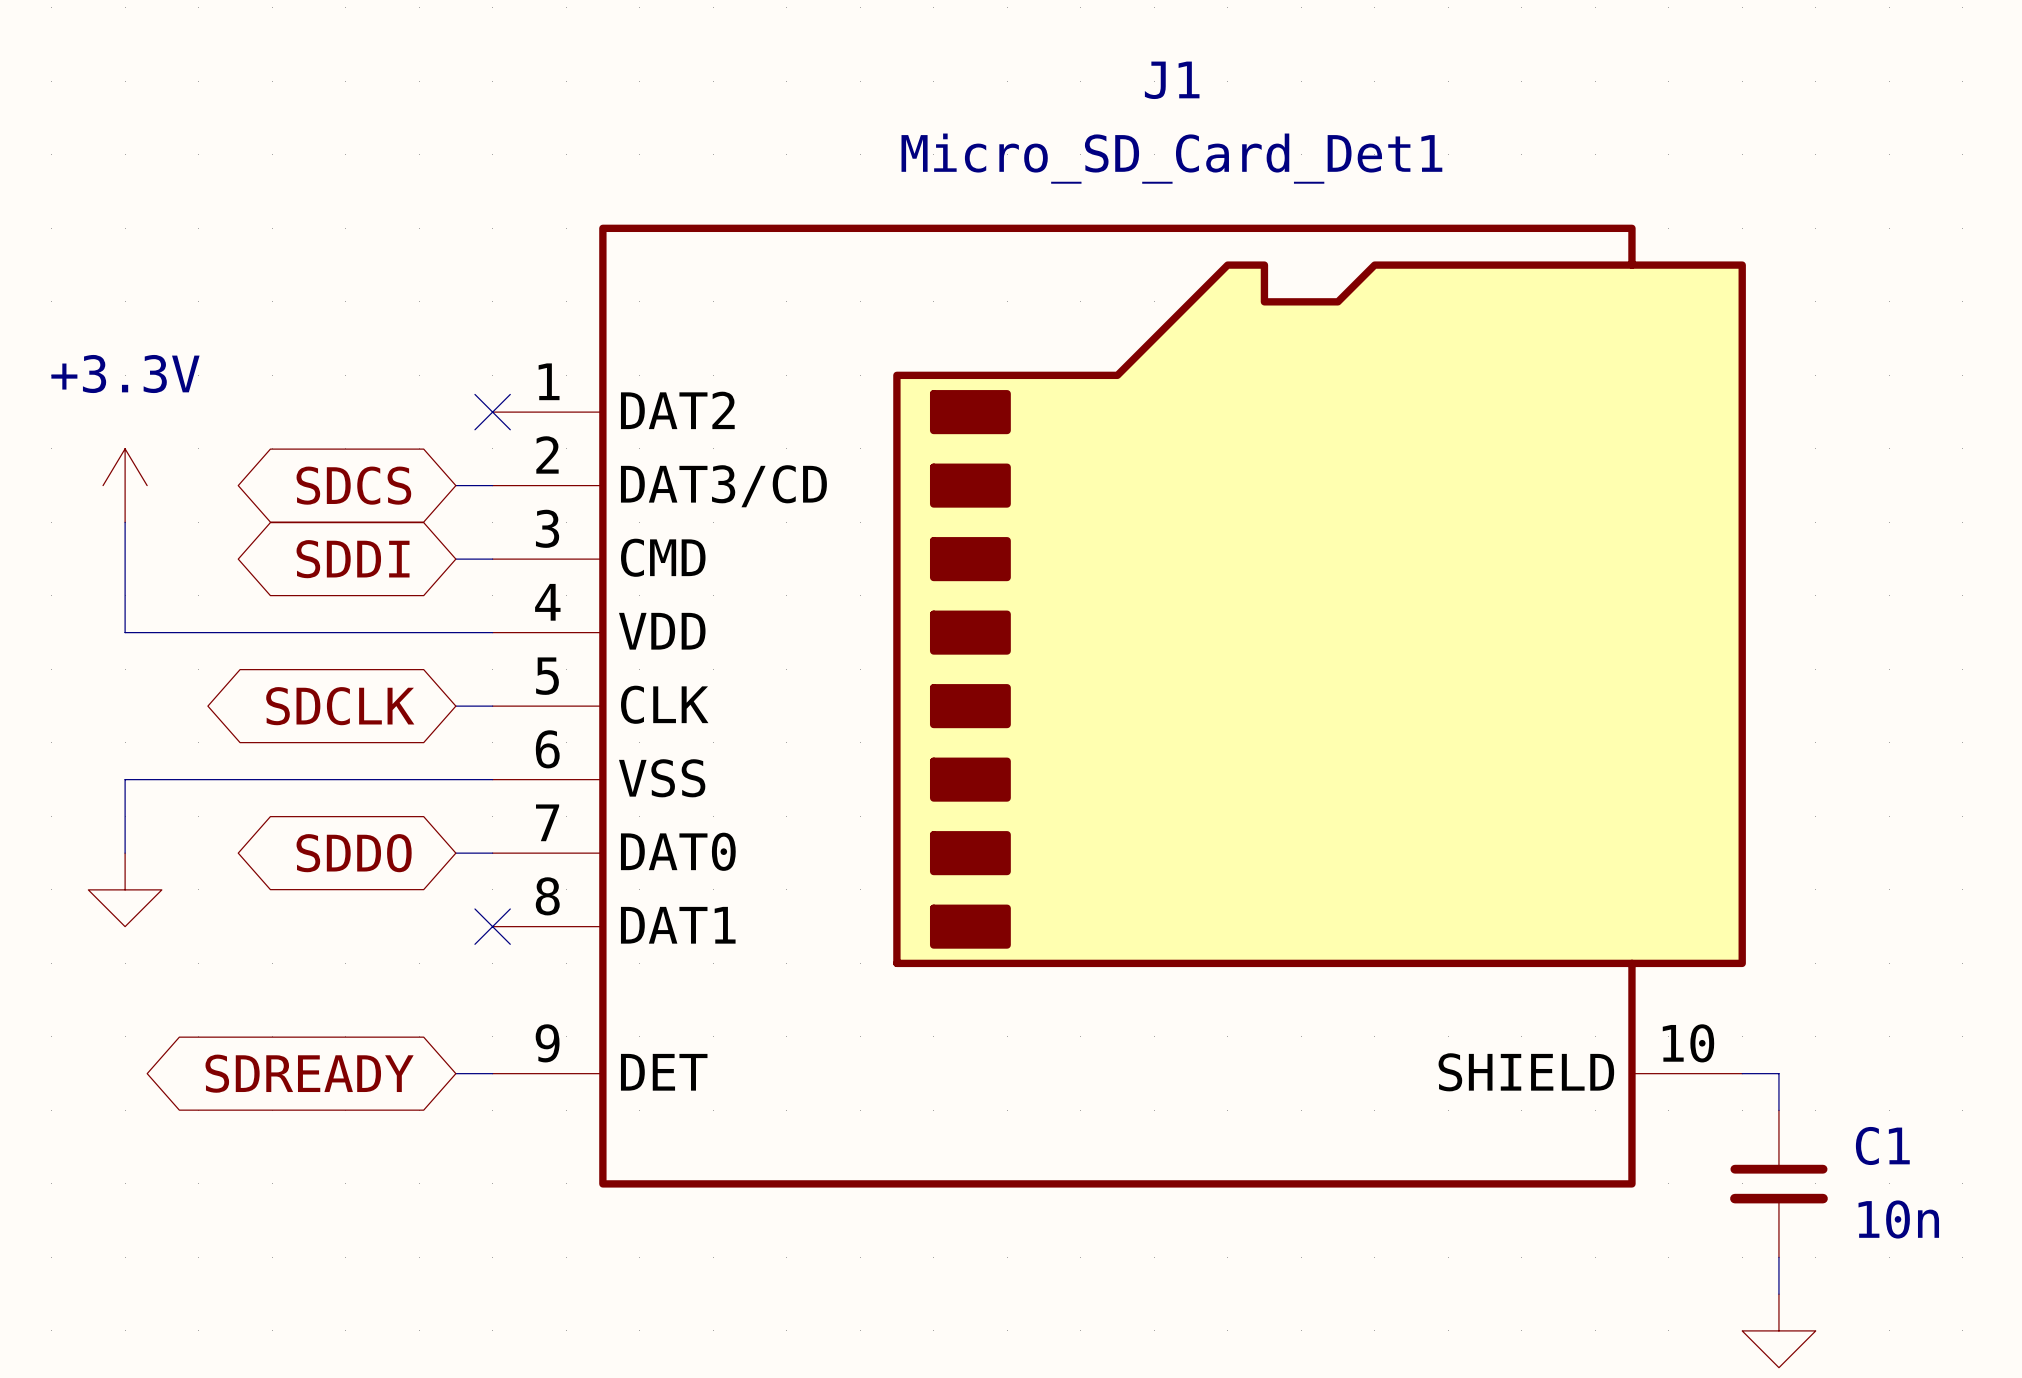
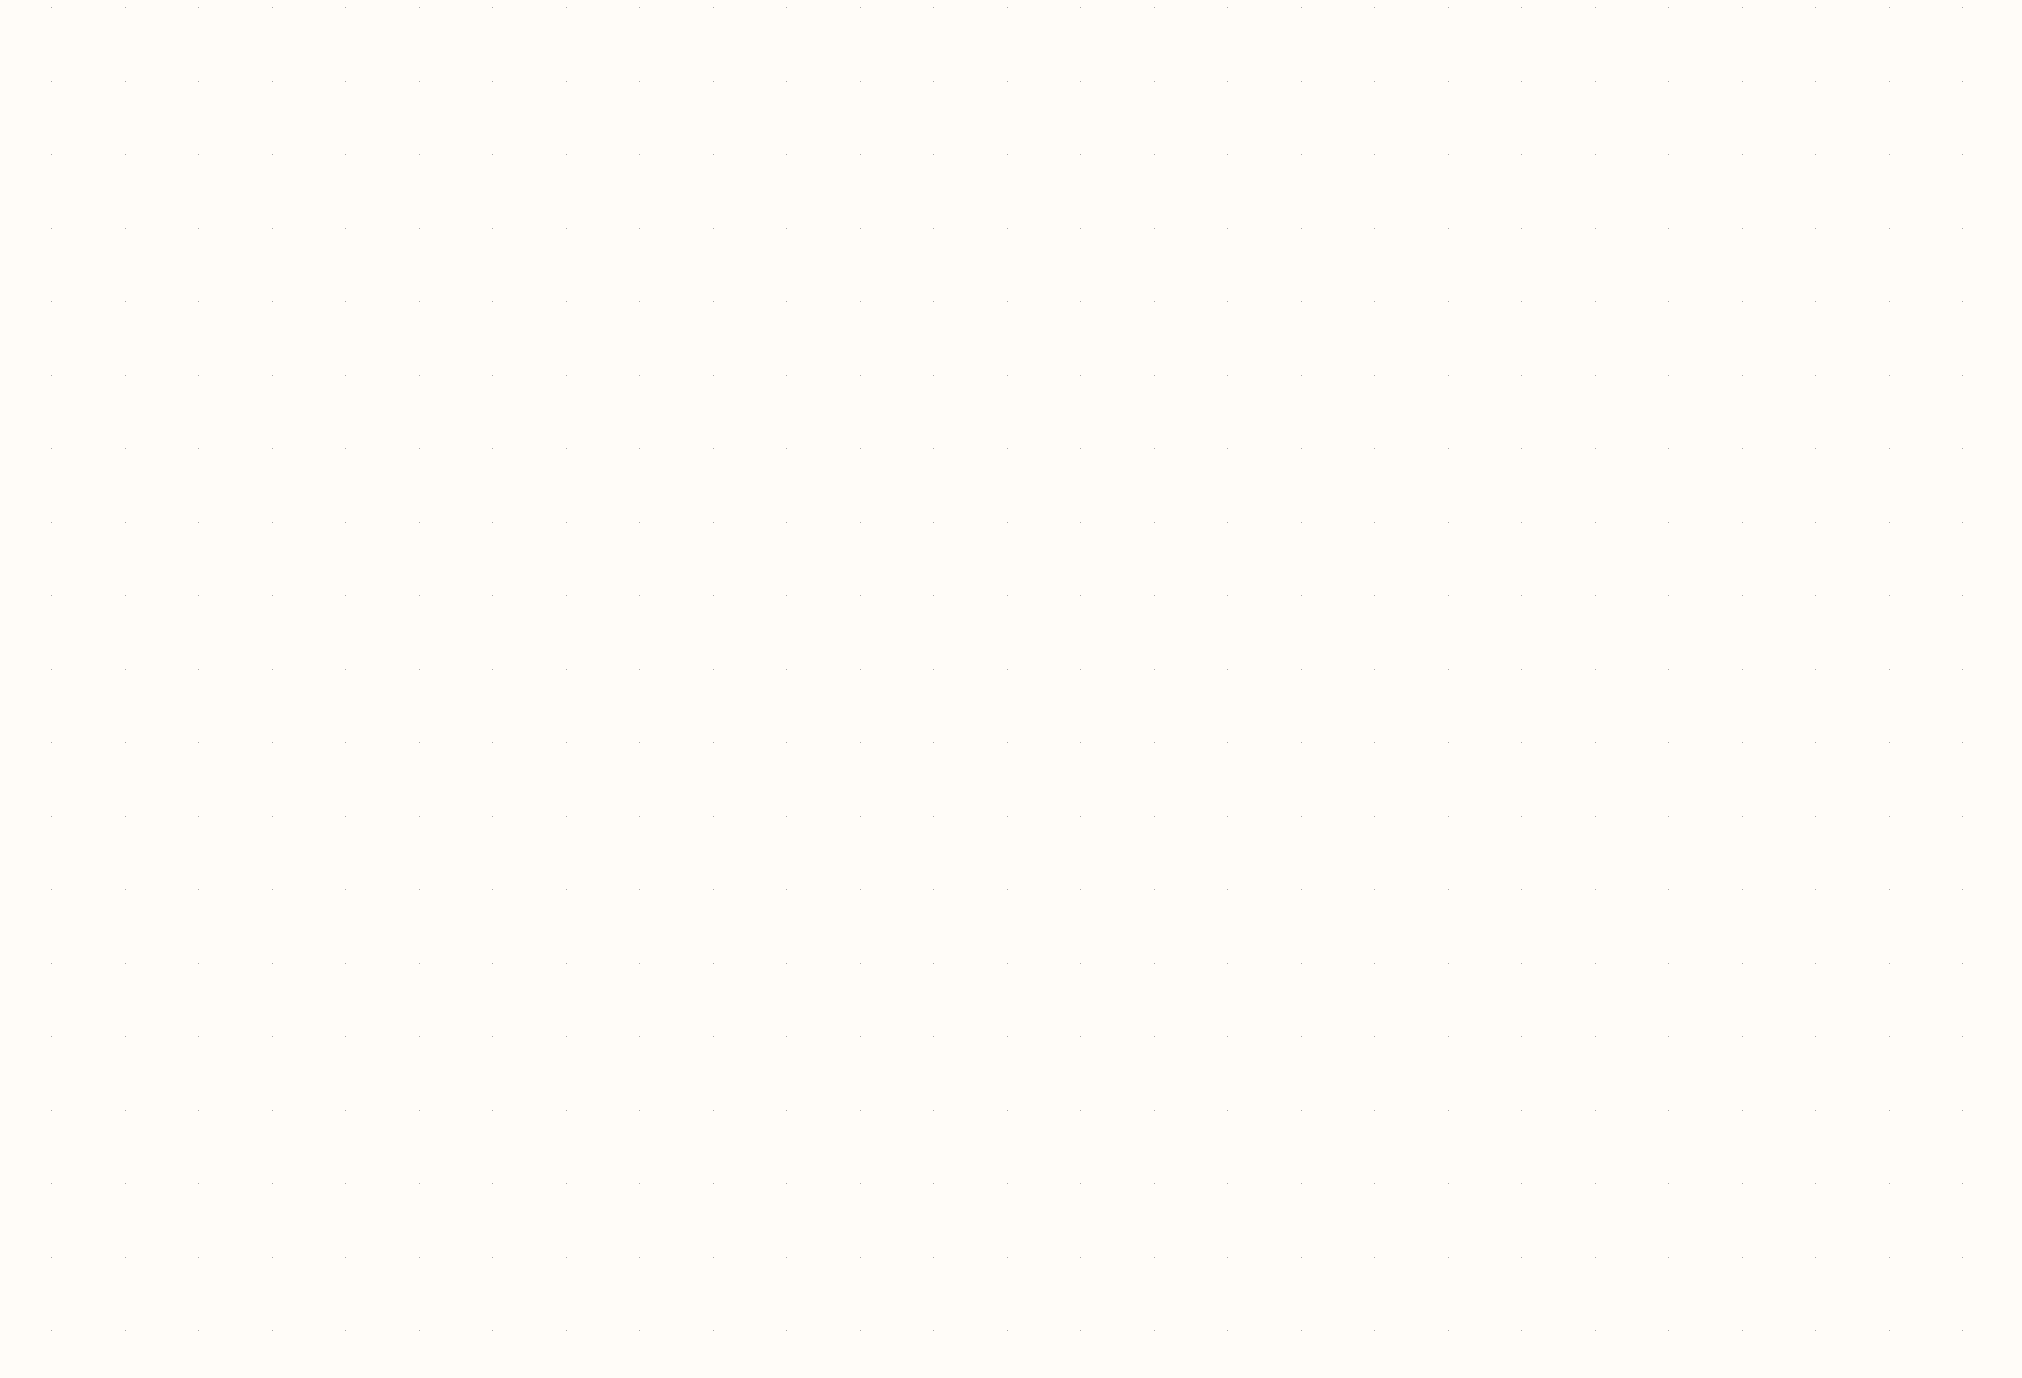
no-connect mark: (492, 412) -> none
power symbol: +3.3V (125, 485) -> none
global label: SDCS (353, 485) -> none
wire: (455, 485) (492, 485) -> none
wire: (125, 522) (125, 632) (492, 632) -> none
global label: SDDI (353, 559) -> none
wire: (455, 559) (492, 559) -> none
global label: SDCLK (340, 706) -> none
wire: (455, 706) (492, 706) -> none
J1: Micro_SD_Card_Det1 (1119, 706) -> none
wire: (492, 779) (125, 779) (125, 853) -> none
global label: SDDO (354, 853) -> none
wire: (455, 853) (492, 853) -> none
power symbol: (125, 889) -> none
no-connect mark: (492, 926) -> none
global label: SDREADY (309, 1073) -> none
wire: (455, 1073) (492, 1073) -> none
wire: (1742, 1073) (1778, 1073) (1778, 1110) -> none
C1: 10n (1778, 1183) -> none
wire: (1778, 1257) (1778, 1294) -> none
power symbol: (1778, 1330) -> none

